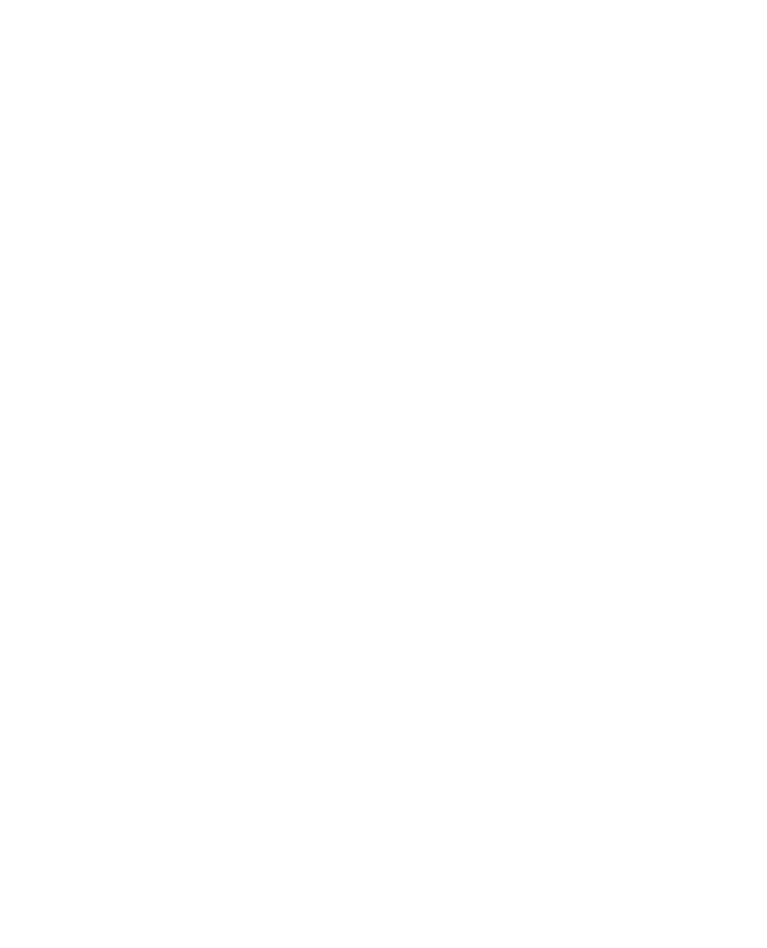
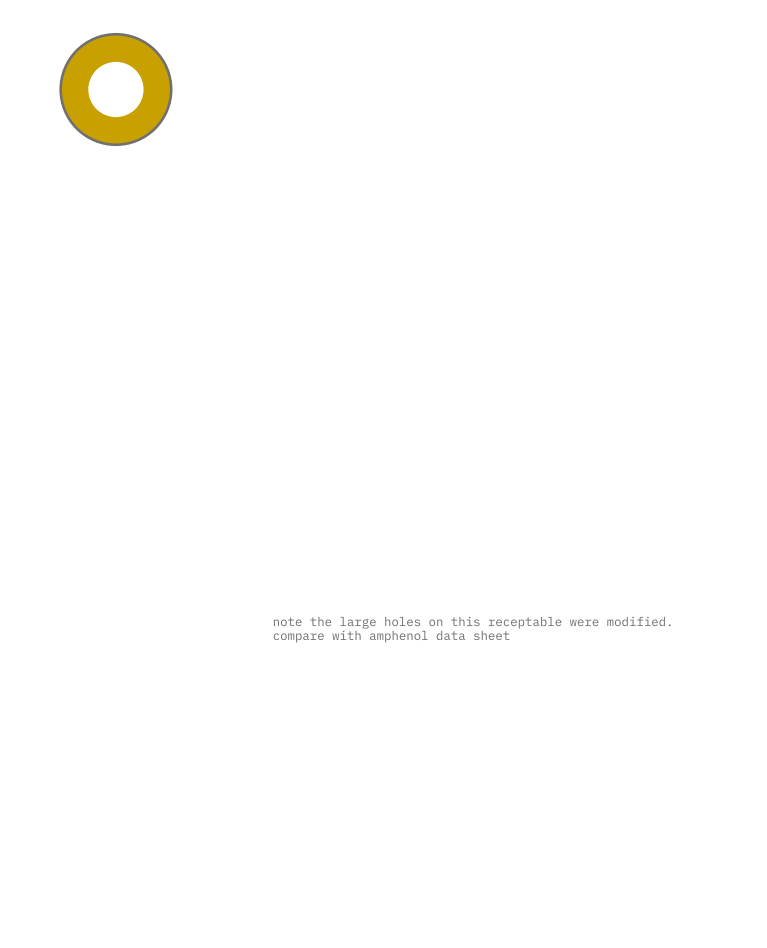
part: none -> (115, 89)
text: none -> note the large holes on this receptable were modified. (472, 622)
text: none -> compare with amphenol data sheet (391, 636)

